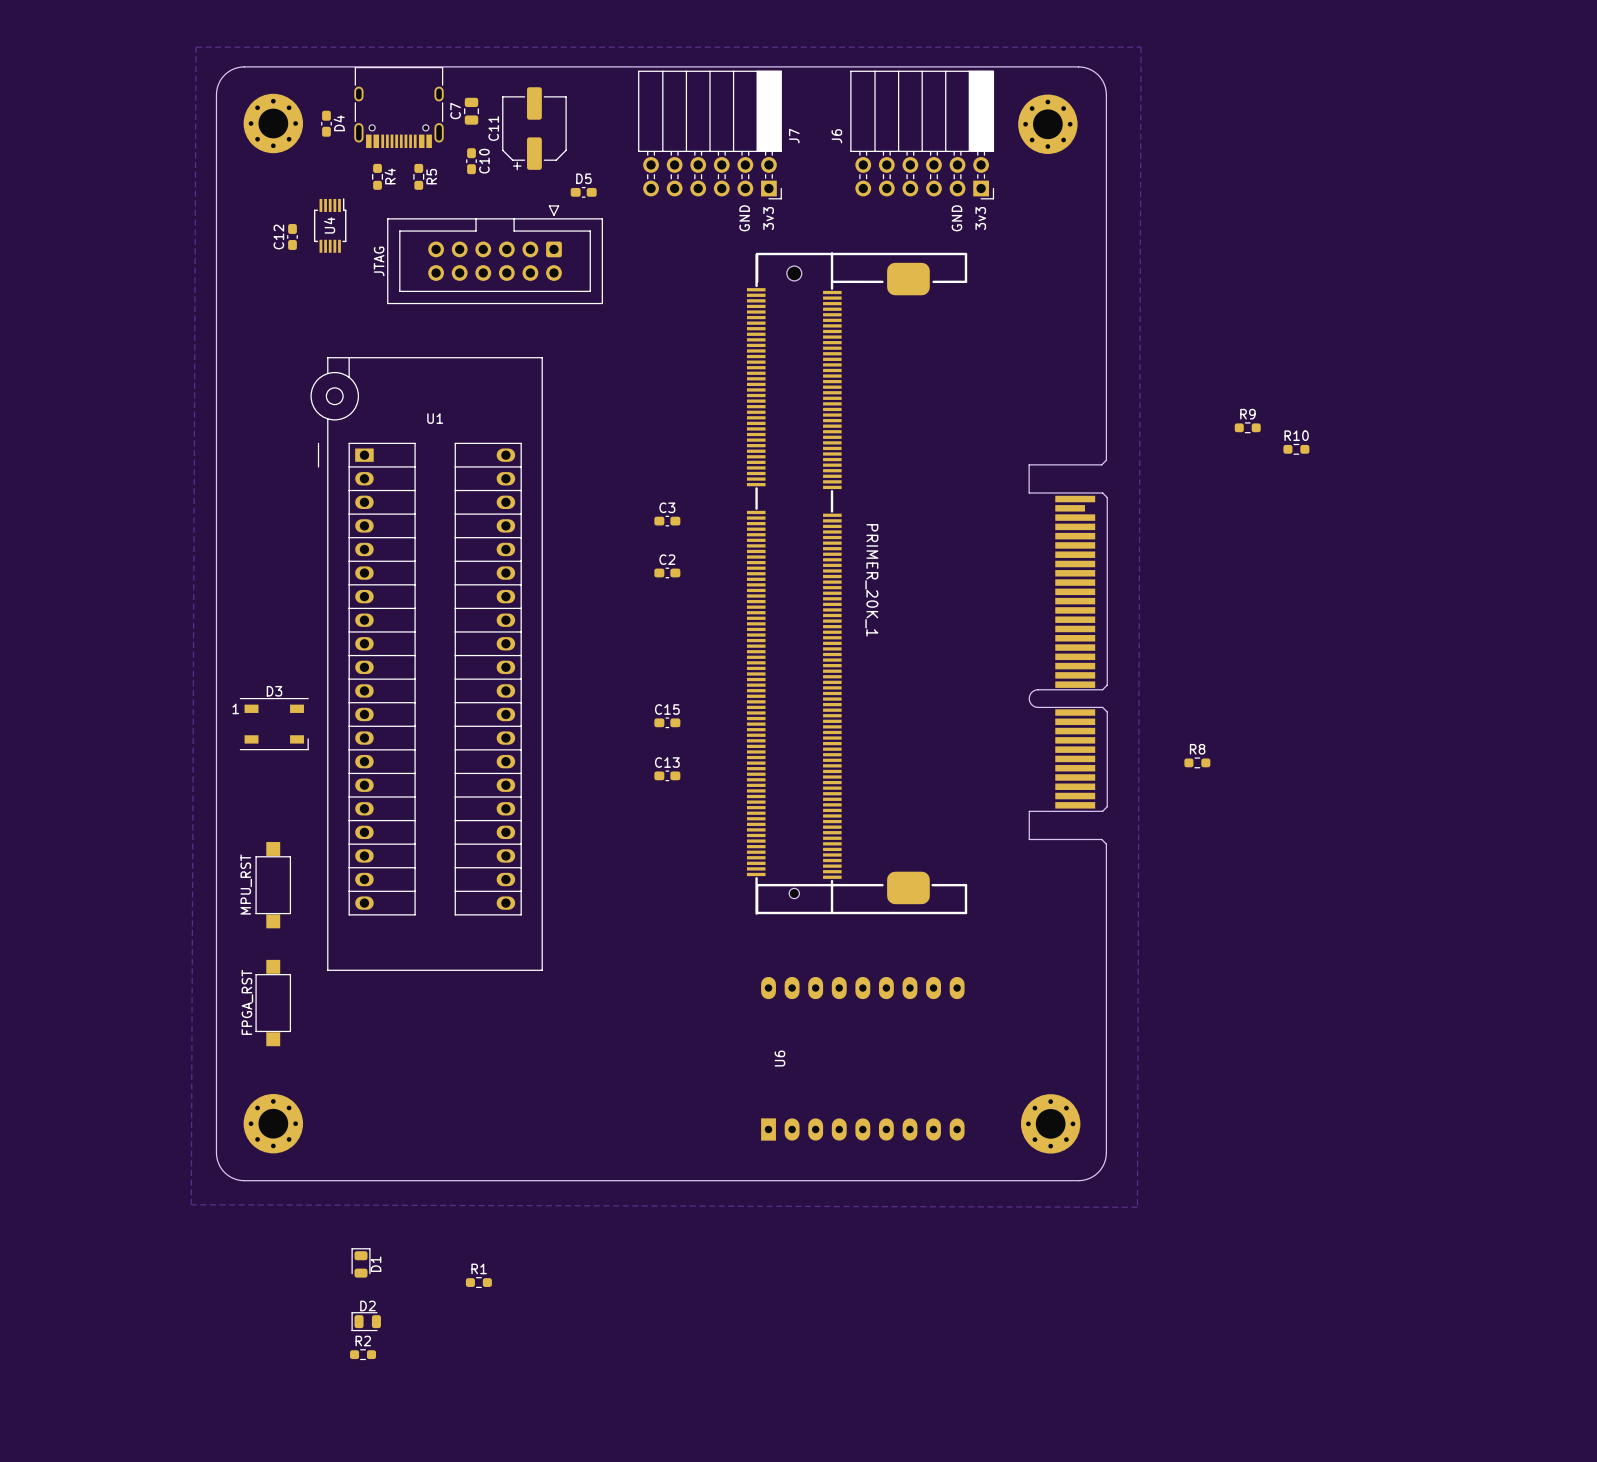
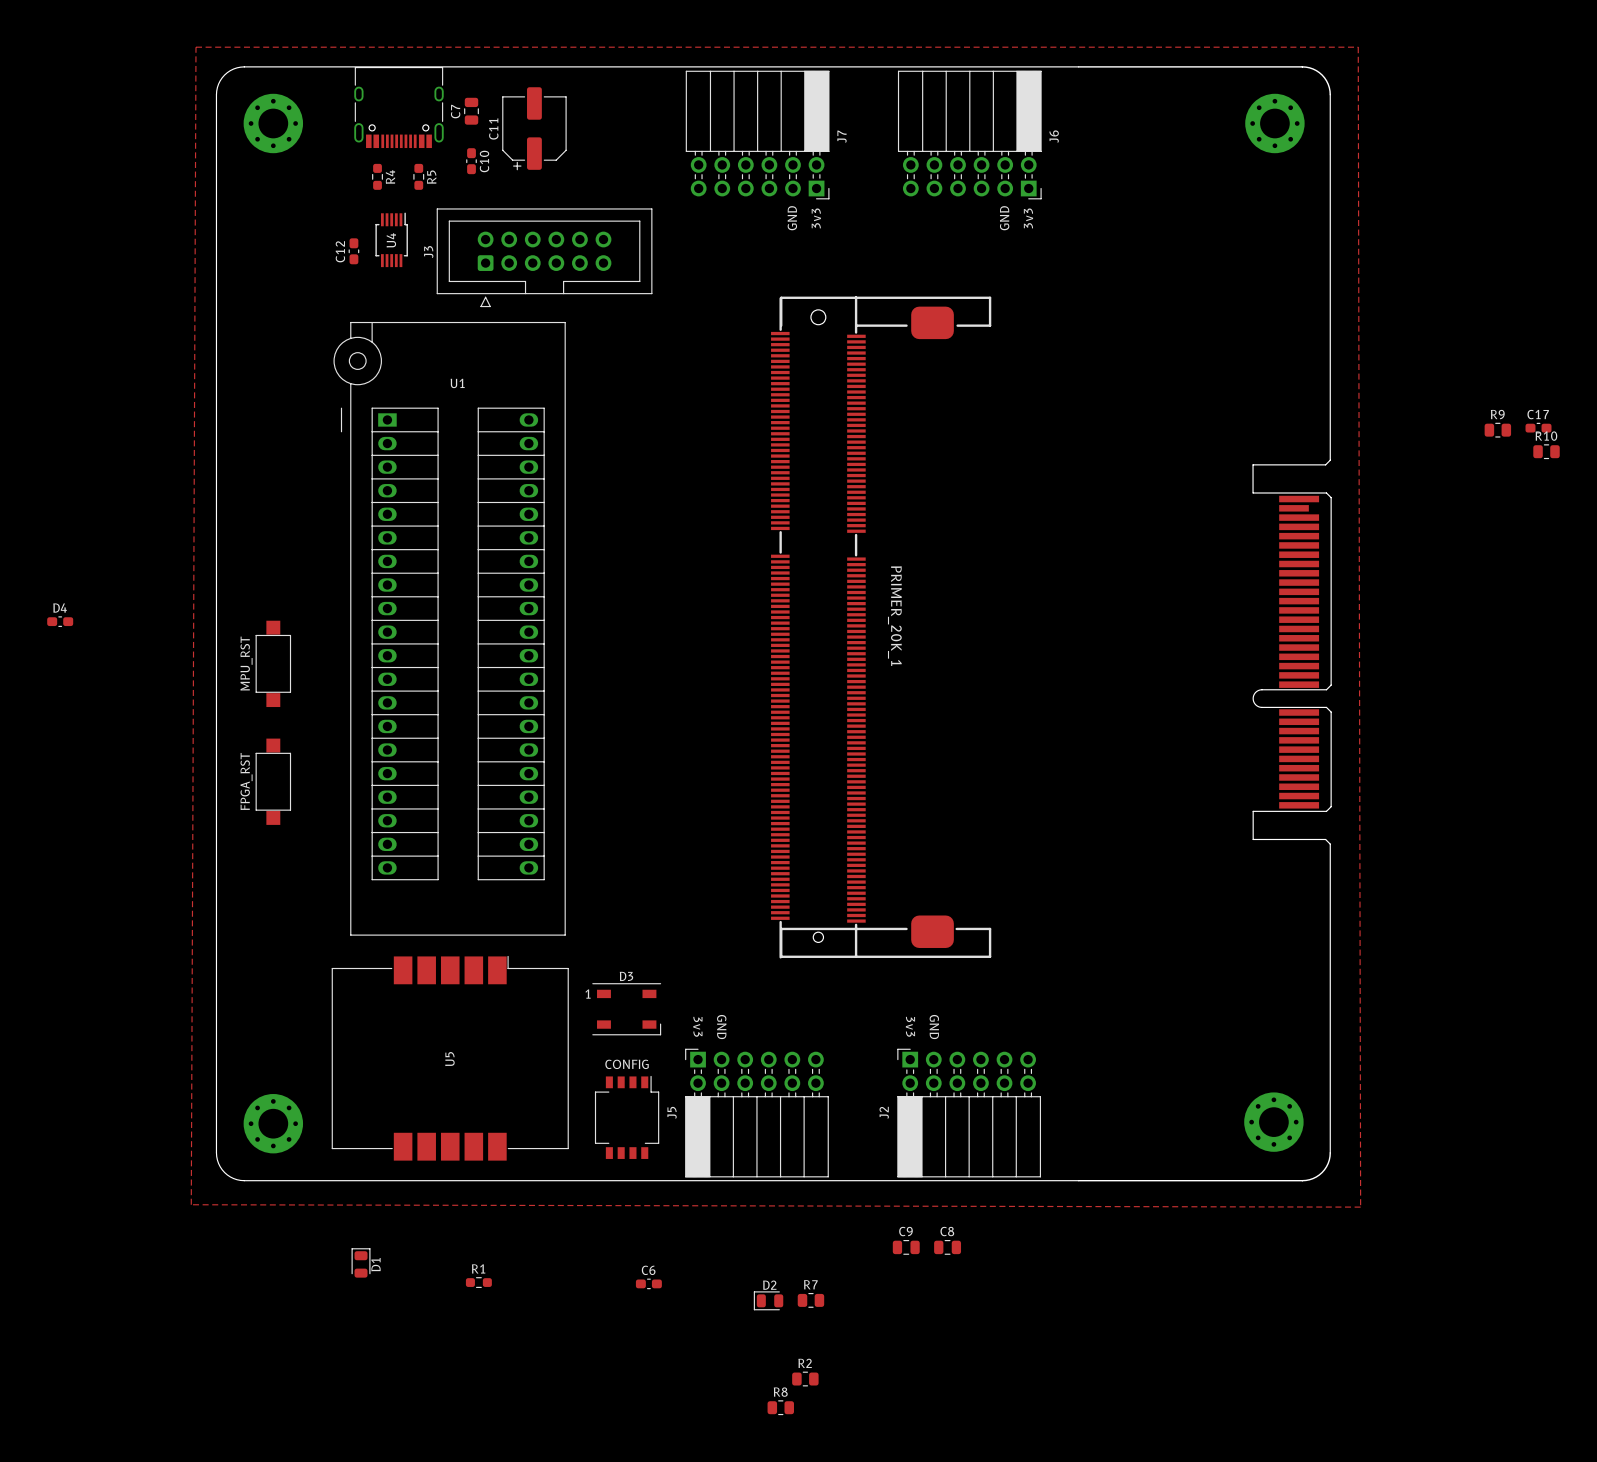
zone outline: (1141, 47) (1137, 1207) (191, 1204) -> (1141, 47) (1358, 47) (1360, 1207) (191, 1204)
board edge: (1078, 66) (1095, 72) (1102, 80) (1106, 91) (1106, 460) (1101, 464) (1029, 464) (1029, 492) -> (1078, 66) (1306, 67) (1319, 72) (1328, 84) (1330, 94) (1330, 460) (1325, 464) (1253, 464) (1253, 492)
D4 rotation: 0° (326, 123) -> 90° clockwise (60, 621)
D4 position: (326, 123) -> (60, 621)
D4 name position: D4 (339, 123) -> D4 (60, 608)
part position: (1047, 124) -> (1274, 123)
J7 position: (709, 135) -> (757, 135)
J6 position: (922, 135) -> (969, 135)
J6 name position: J6 (836, 136) -> J6 (1054, 136)
D5: (583, 192) -> none
text position: GND (744, 218) -> GND (792, 218)
text position: 3v3 (768, 218) -> 3v3 (816, 218)
text position: GND (956, 218) -> GND (1004, 218)
text position: 3v3 (980, 218) -> 3v3 (1028, 218)
U4 position: (330, 225) -> (391, 239)
C12 position: (292, 236) -> (353, 251)
part: JTAG (495, 254) -> none
J3: none -> (544, 257)
U1 footprint: [310, 357, 543, 971] -> [333, 321, 566, 936]
R9 footprint: [1234, 422, 1261, 434] -> [1484, 422, 1512, 438]
C17: none -> (1538, 428)
R10 footprint: [1283, 443, 1310, 455] -> [1533, 444, 1560, 460]
C3: (667, 521) -> none
C2: (667, 572) -> none
PRIMER_20K_1 position: (857, 583) -> (881, 627)
part position: (1068, 652) -> (1292, 652)
part: none -> MPU_RST (273, 663)
C15: (667, 722) -> none
D3 position: (274, 724) -> (626, 1009)
R8 footprint: [1184, 757, 1211, 769] -> [767, 1400, 795, 1416]
C13: (667, 775) -> none
part: none -> FPGA_RST (273, 781)
board edge: (1029, 811) (1029, 839) (1101, 839) (1106, 844) (1106, 1156) (1102, 1166) (1095, 1174) (1078, 1180) -> (1253, 811) (1253, 839) (1325, 839) (1330, 844) (1330, 1152) (1328, 1163) (1319, 1174) (1306, 1180) (1078, 1180)
part: (273, 885) -> none
part: (273, 1003) -> none
text: none -> 3v3 (697, 1026)
text: none -> GND (721, 1027)
text: none -> 3v3 (910, 1026)
text: none -> GND (934, 1027)
U5: none -> (450, 1058)
U6: (862, 1058) -> none
J5: none -> (756, 1113)
J2: none -> (969, 1113)
part: none -> CONFIG (627, 1117)
part position: (1050, 1123) -> (1273, 1122)
C9: none -> (906, 1247)
C8: none -> (947, 1247)
C6: none -> (648, 1283)
R7: none -> (810, 1300)
D2 position: (366, 1321) -> (768, 1300)
R2 footprint: [350, 1349, 377, 1361] -> [792, 1371, 819, 1387]

